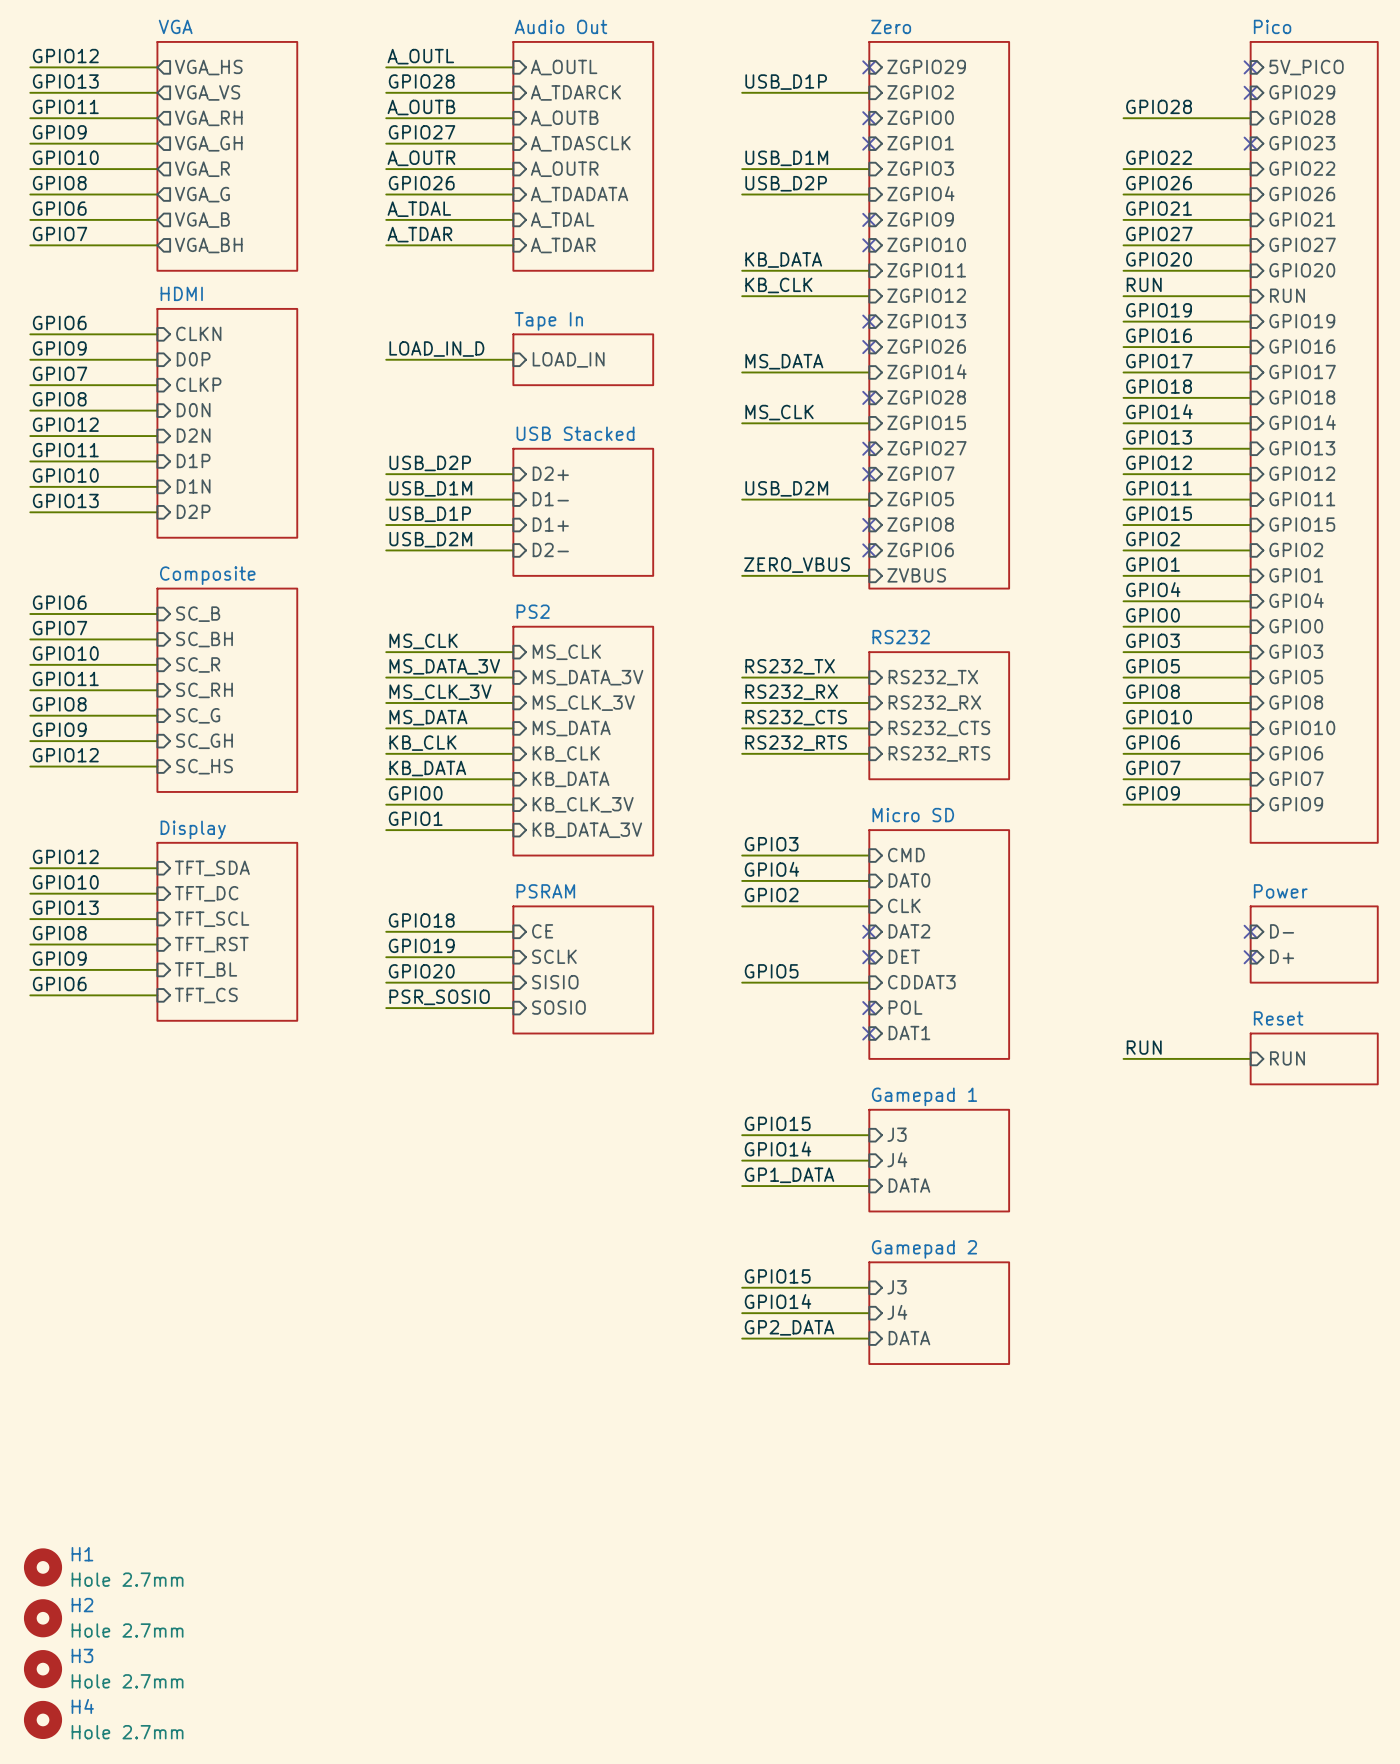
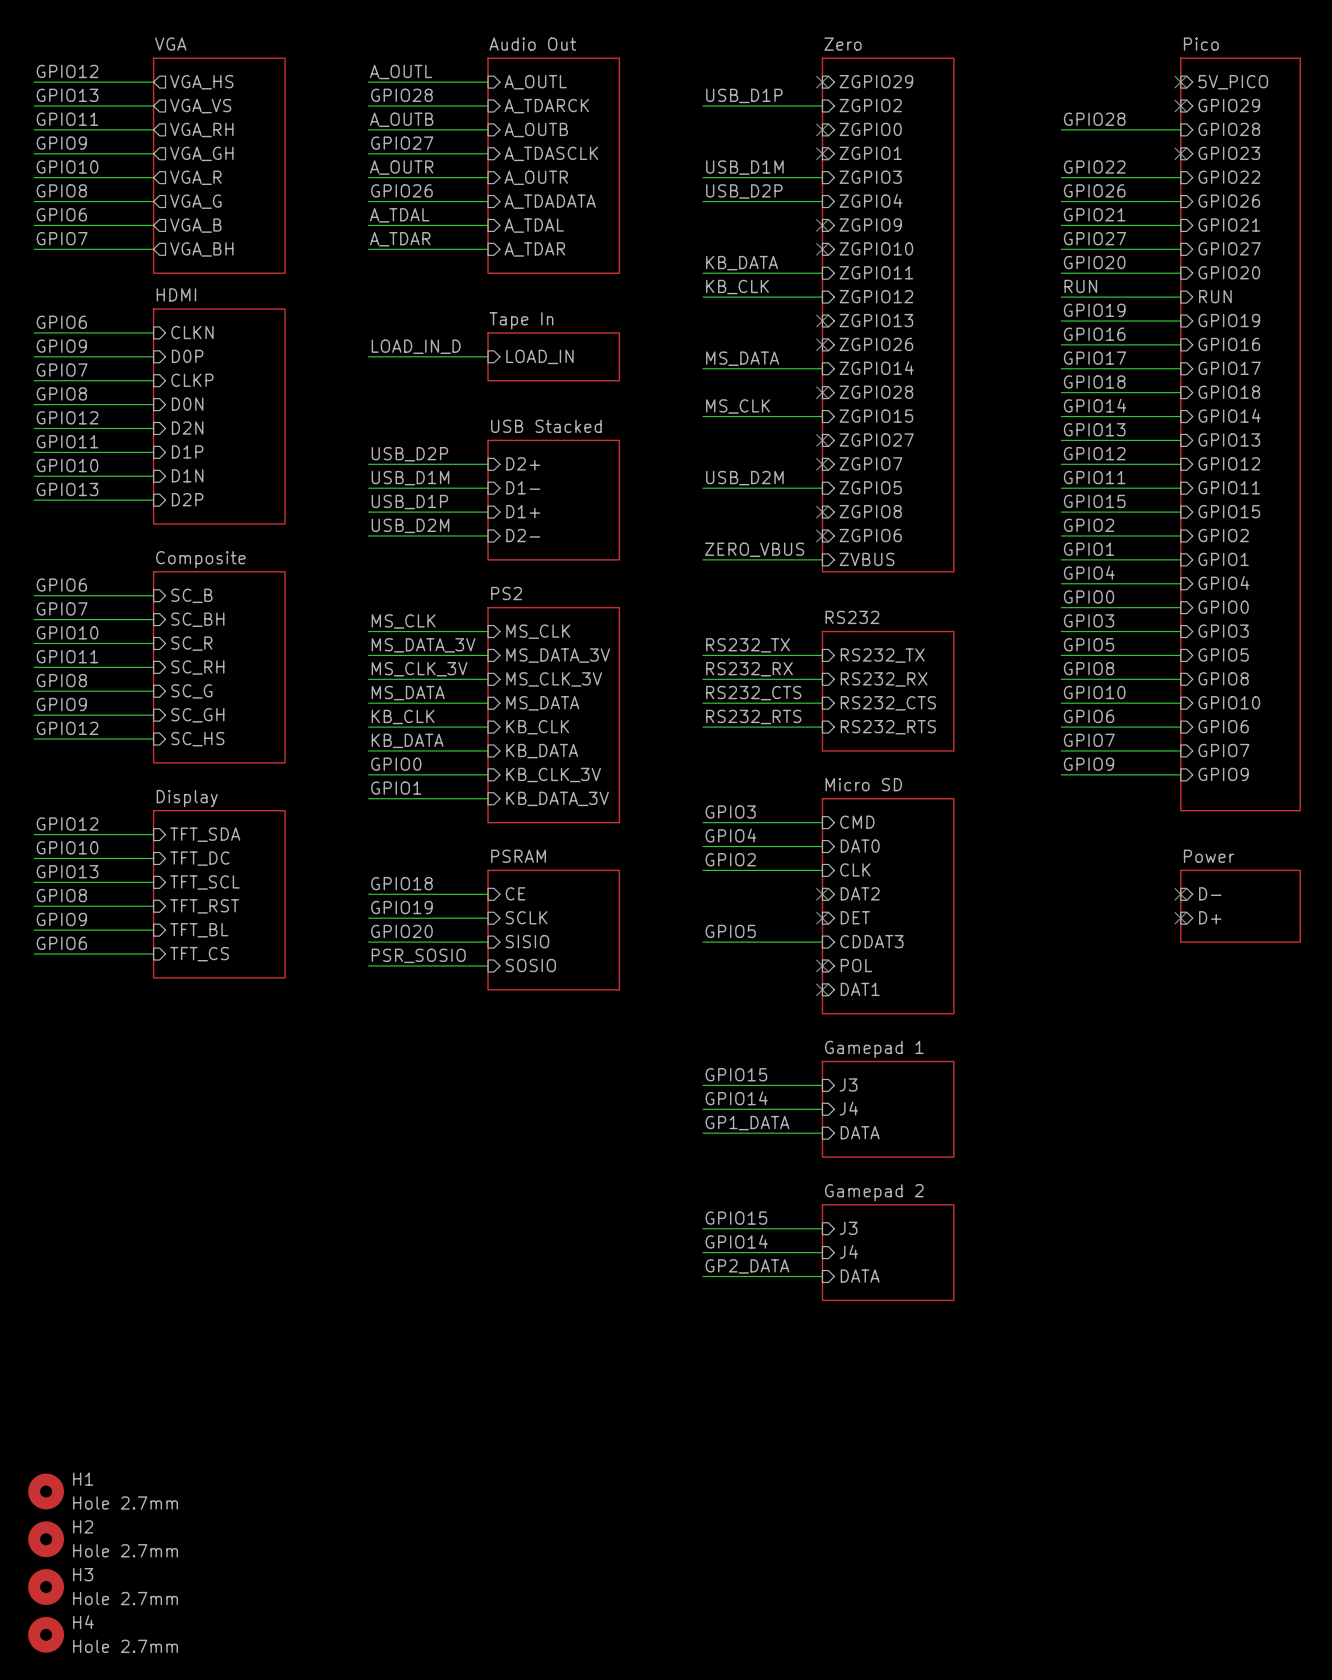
label: RUN (1144, 1047) -> none
wire: (1123, 1058) (1250, 1058) -> none
sheet pin: RUN (1287, 1058) -> none
sheet Reset: (1314, 1058) -> none

